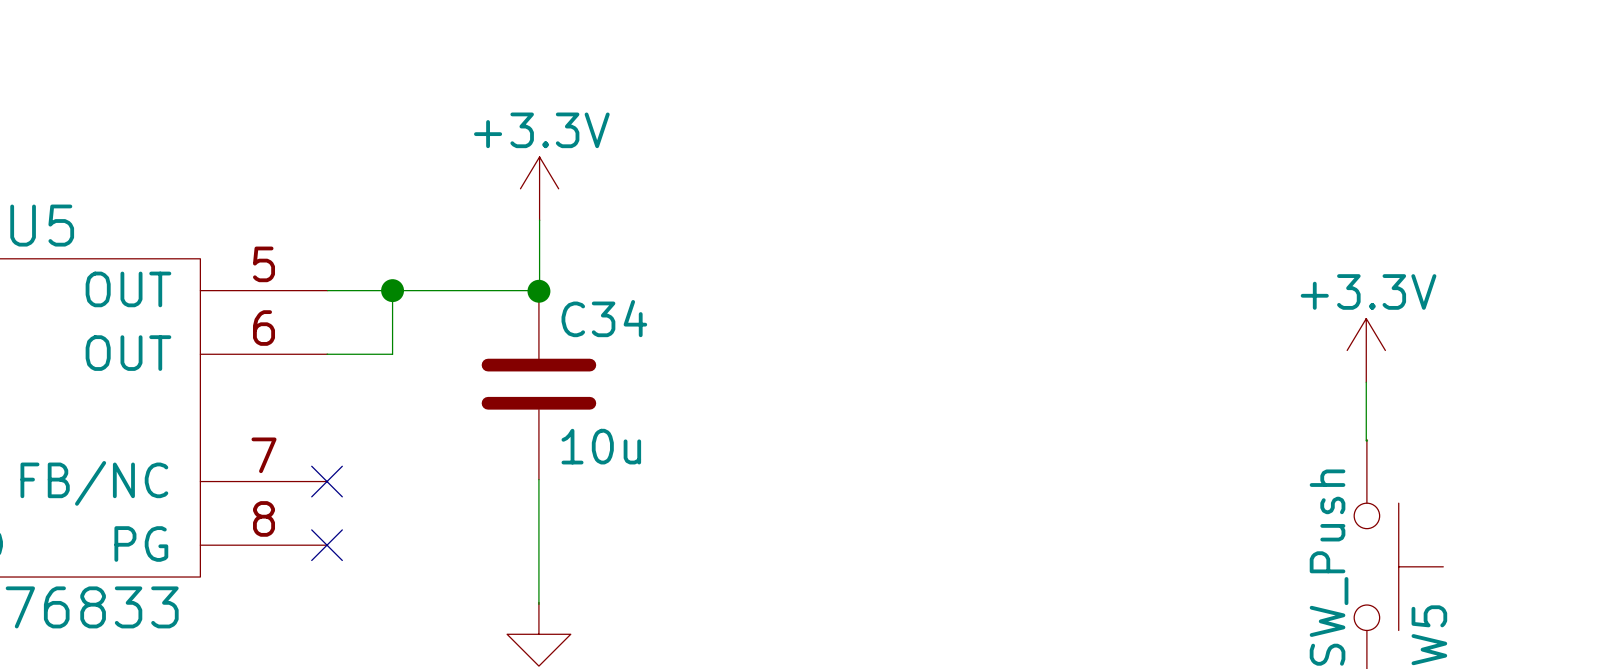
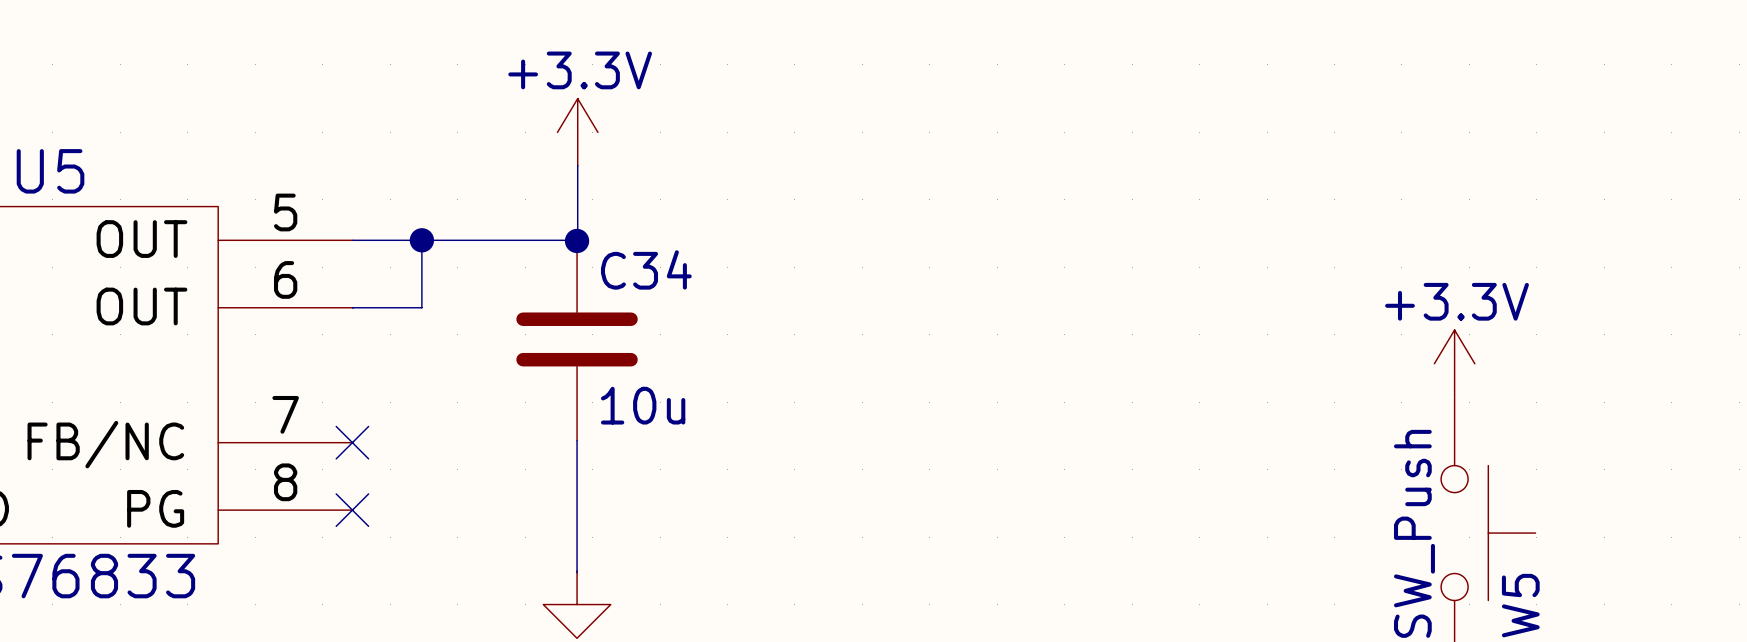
power symbol position: +3.3V (1366, 350) -> +3.3V (1454, 363)
wire: (1366, 382) (1367, 440) -> none

